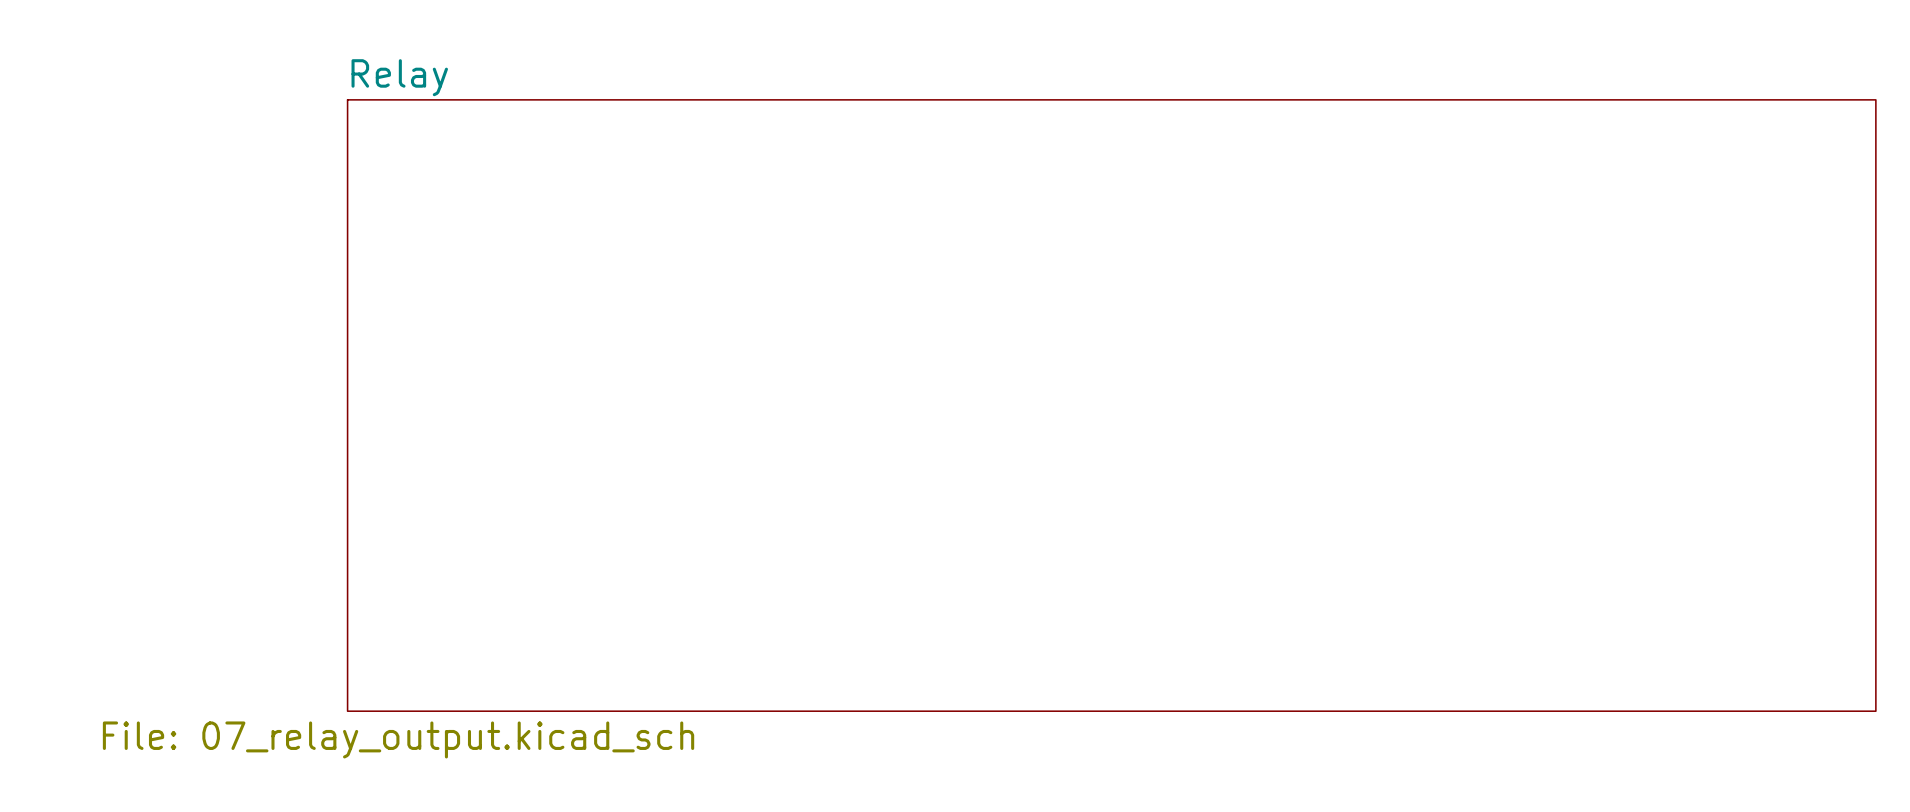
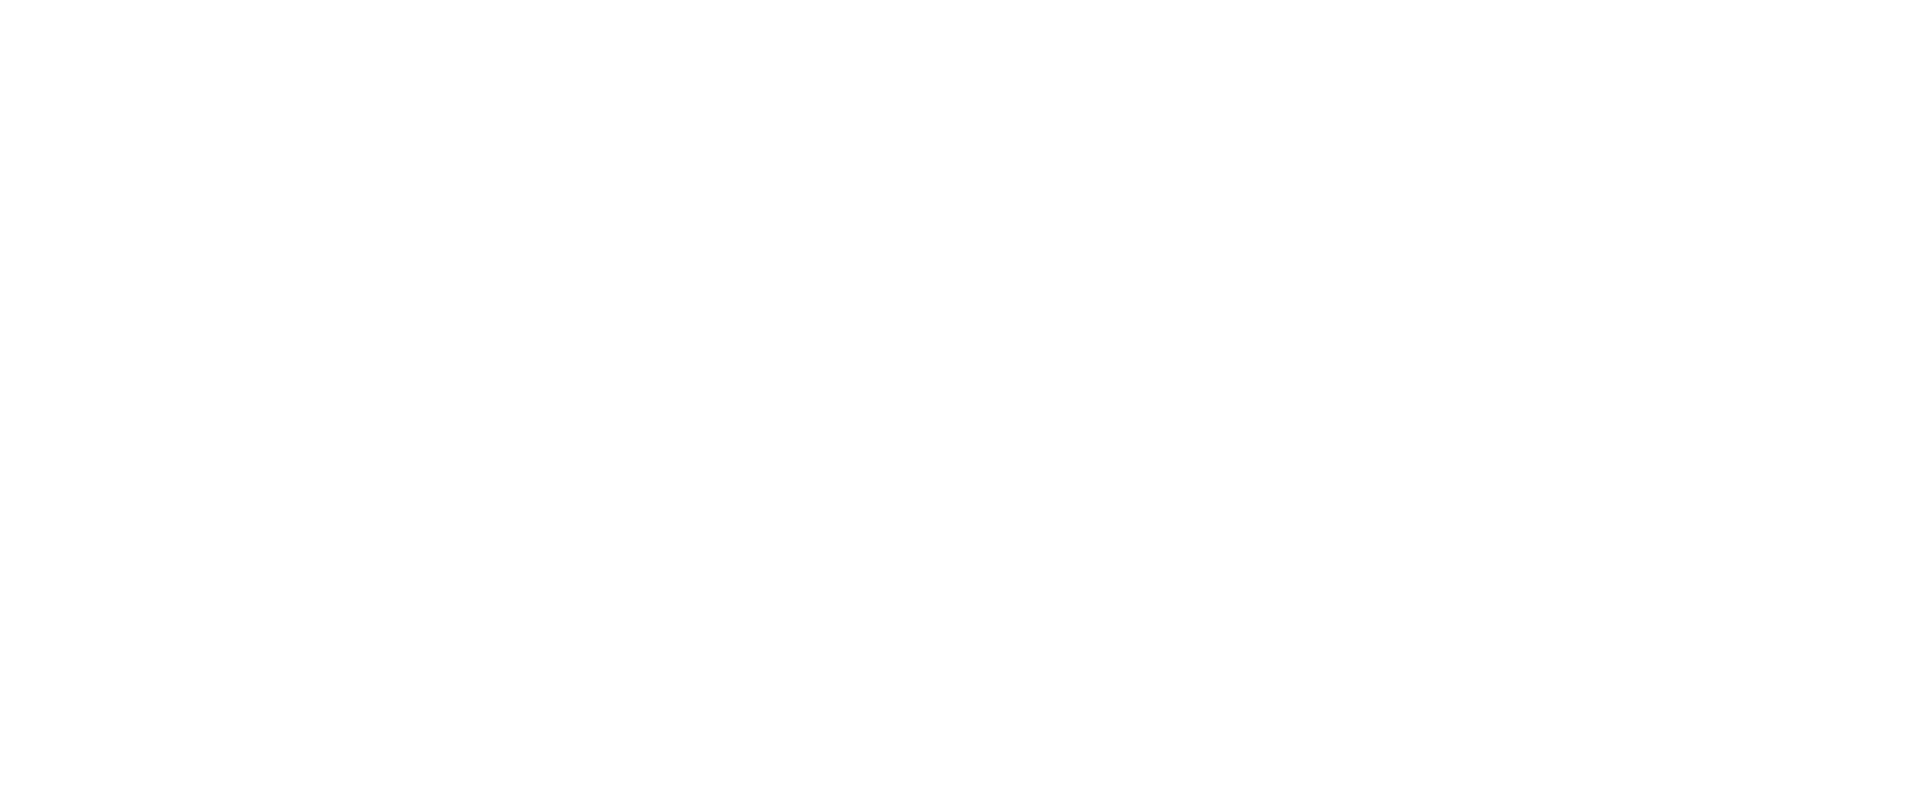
sheet Relay: File: 07_relay_output.kicad_sch (1111, 405) -> none

